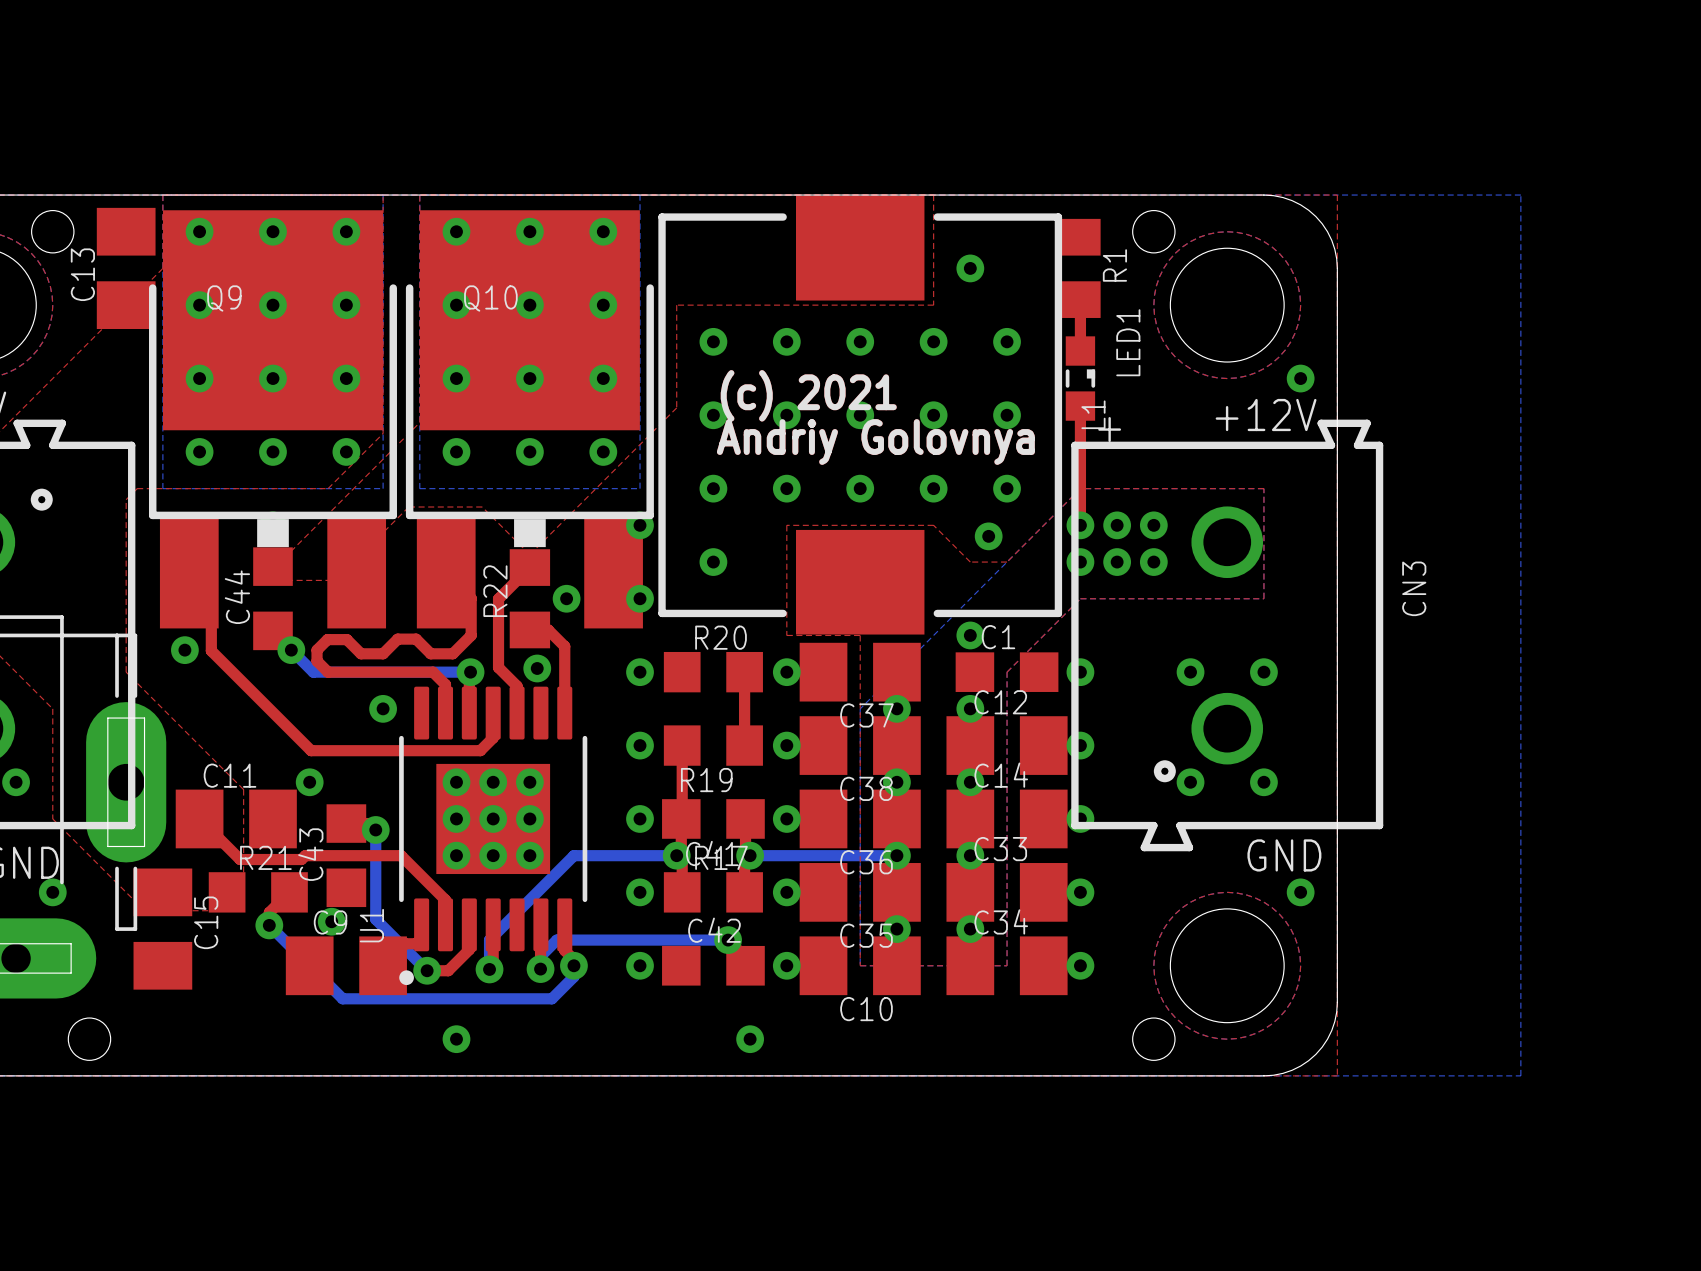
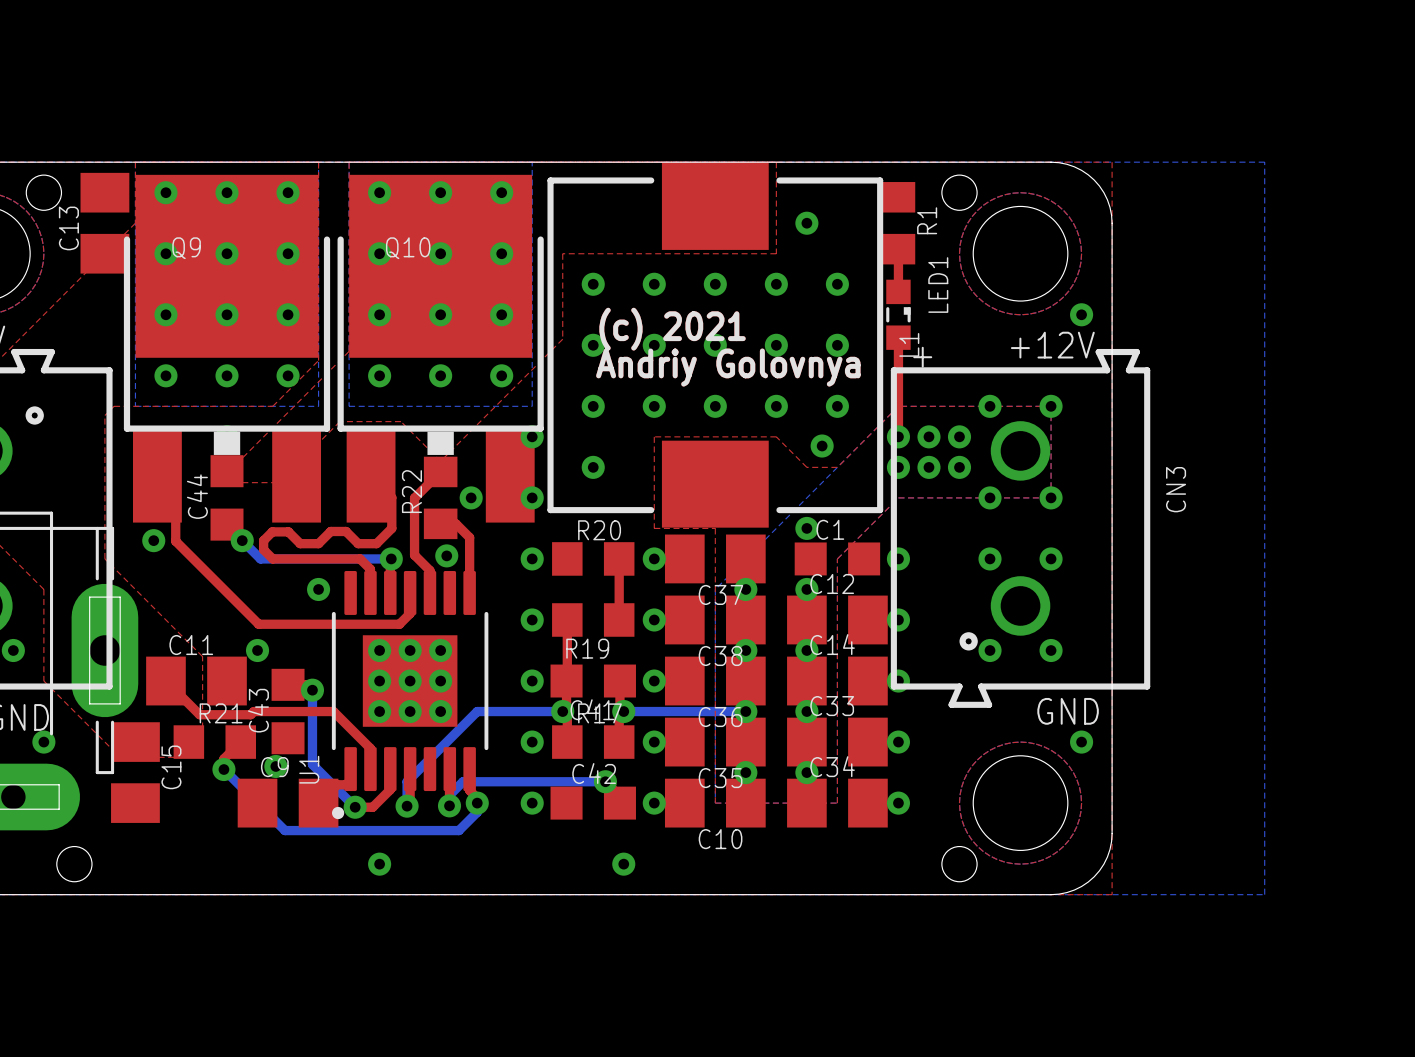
via: none -> (990, 406)
via: none -> (1051, 406)
via: none -> (990, 497)
via: none -> (1051, 497)

